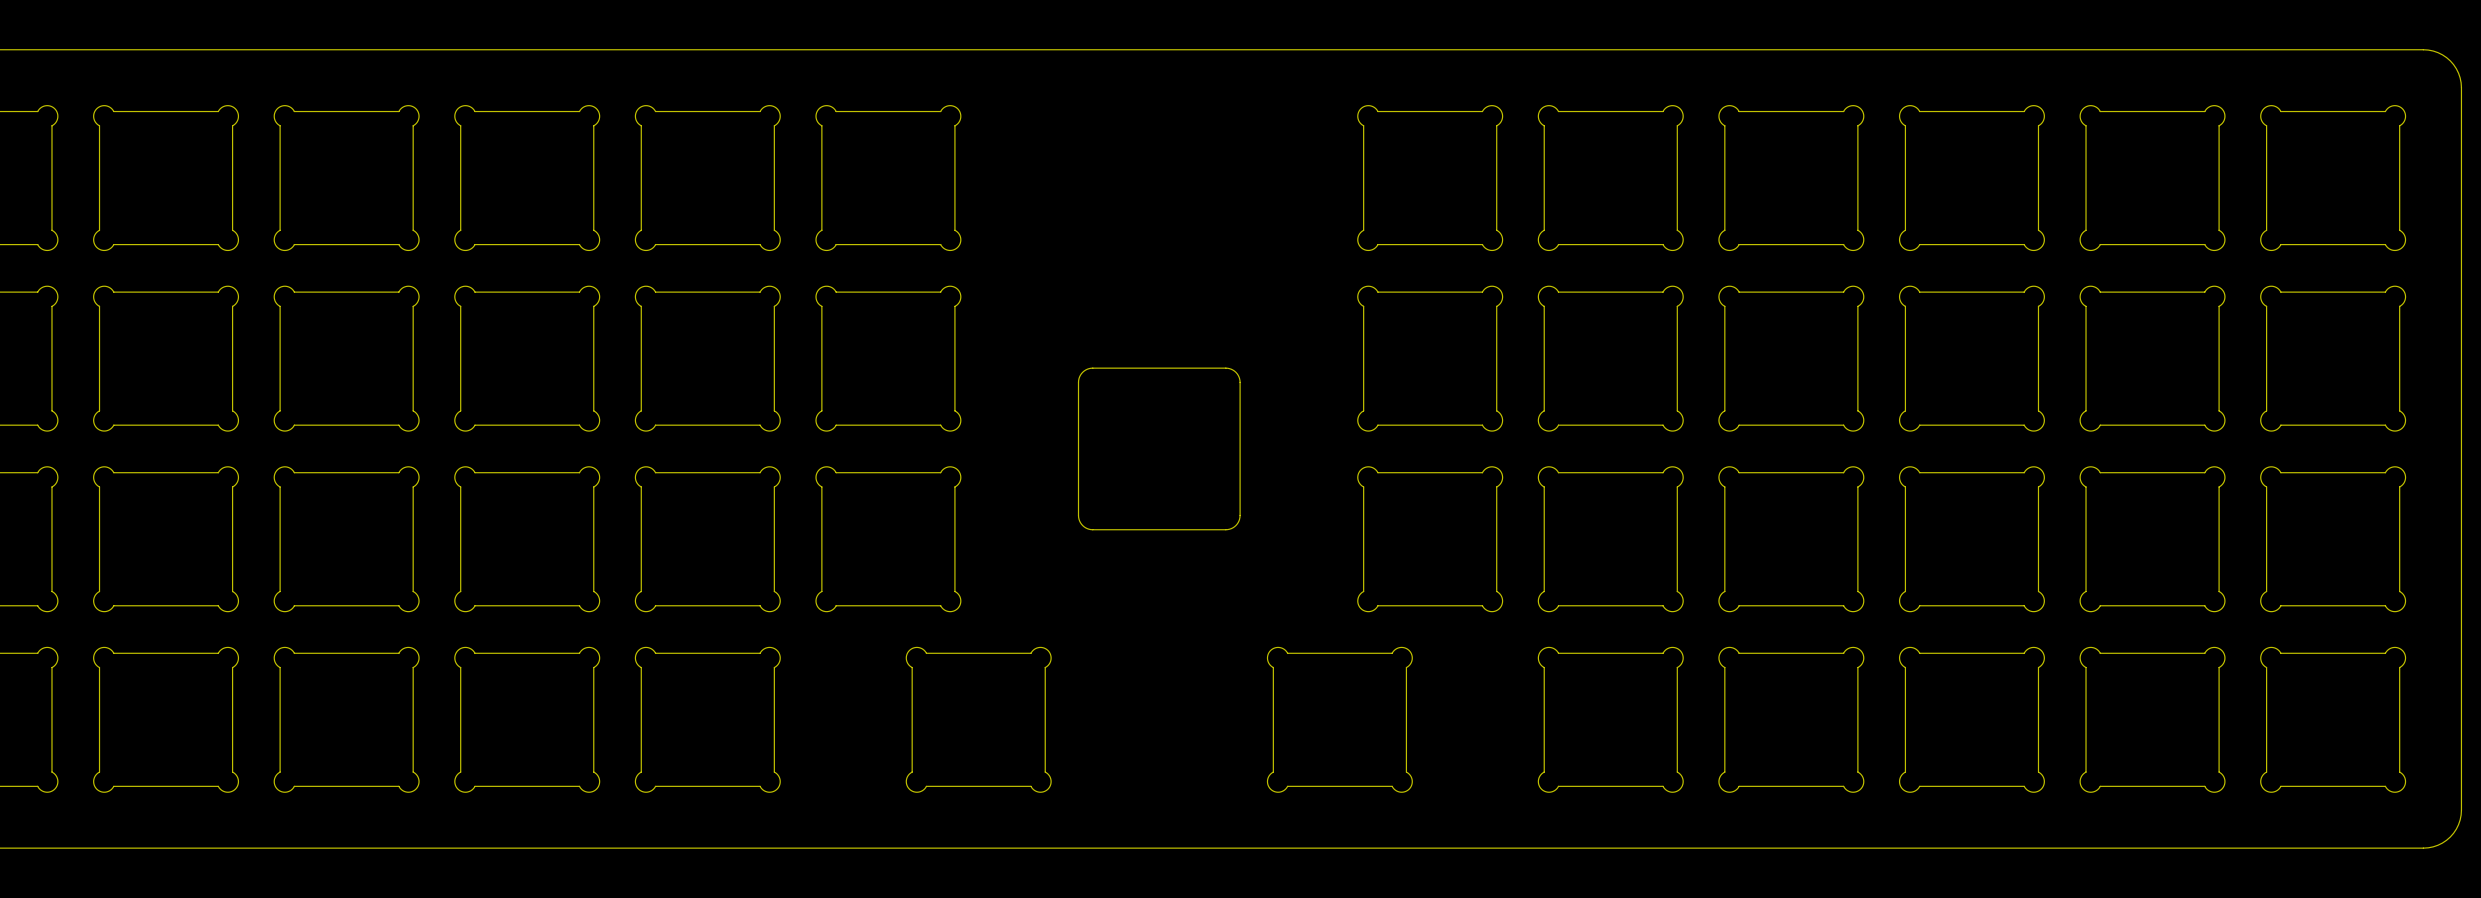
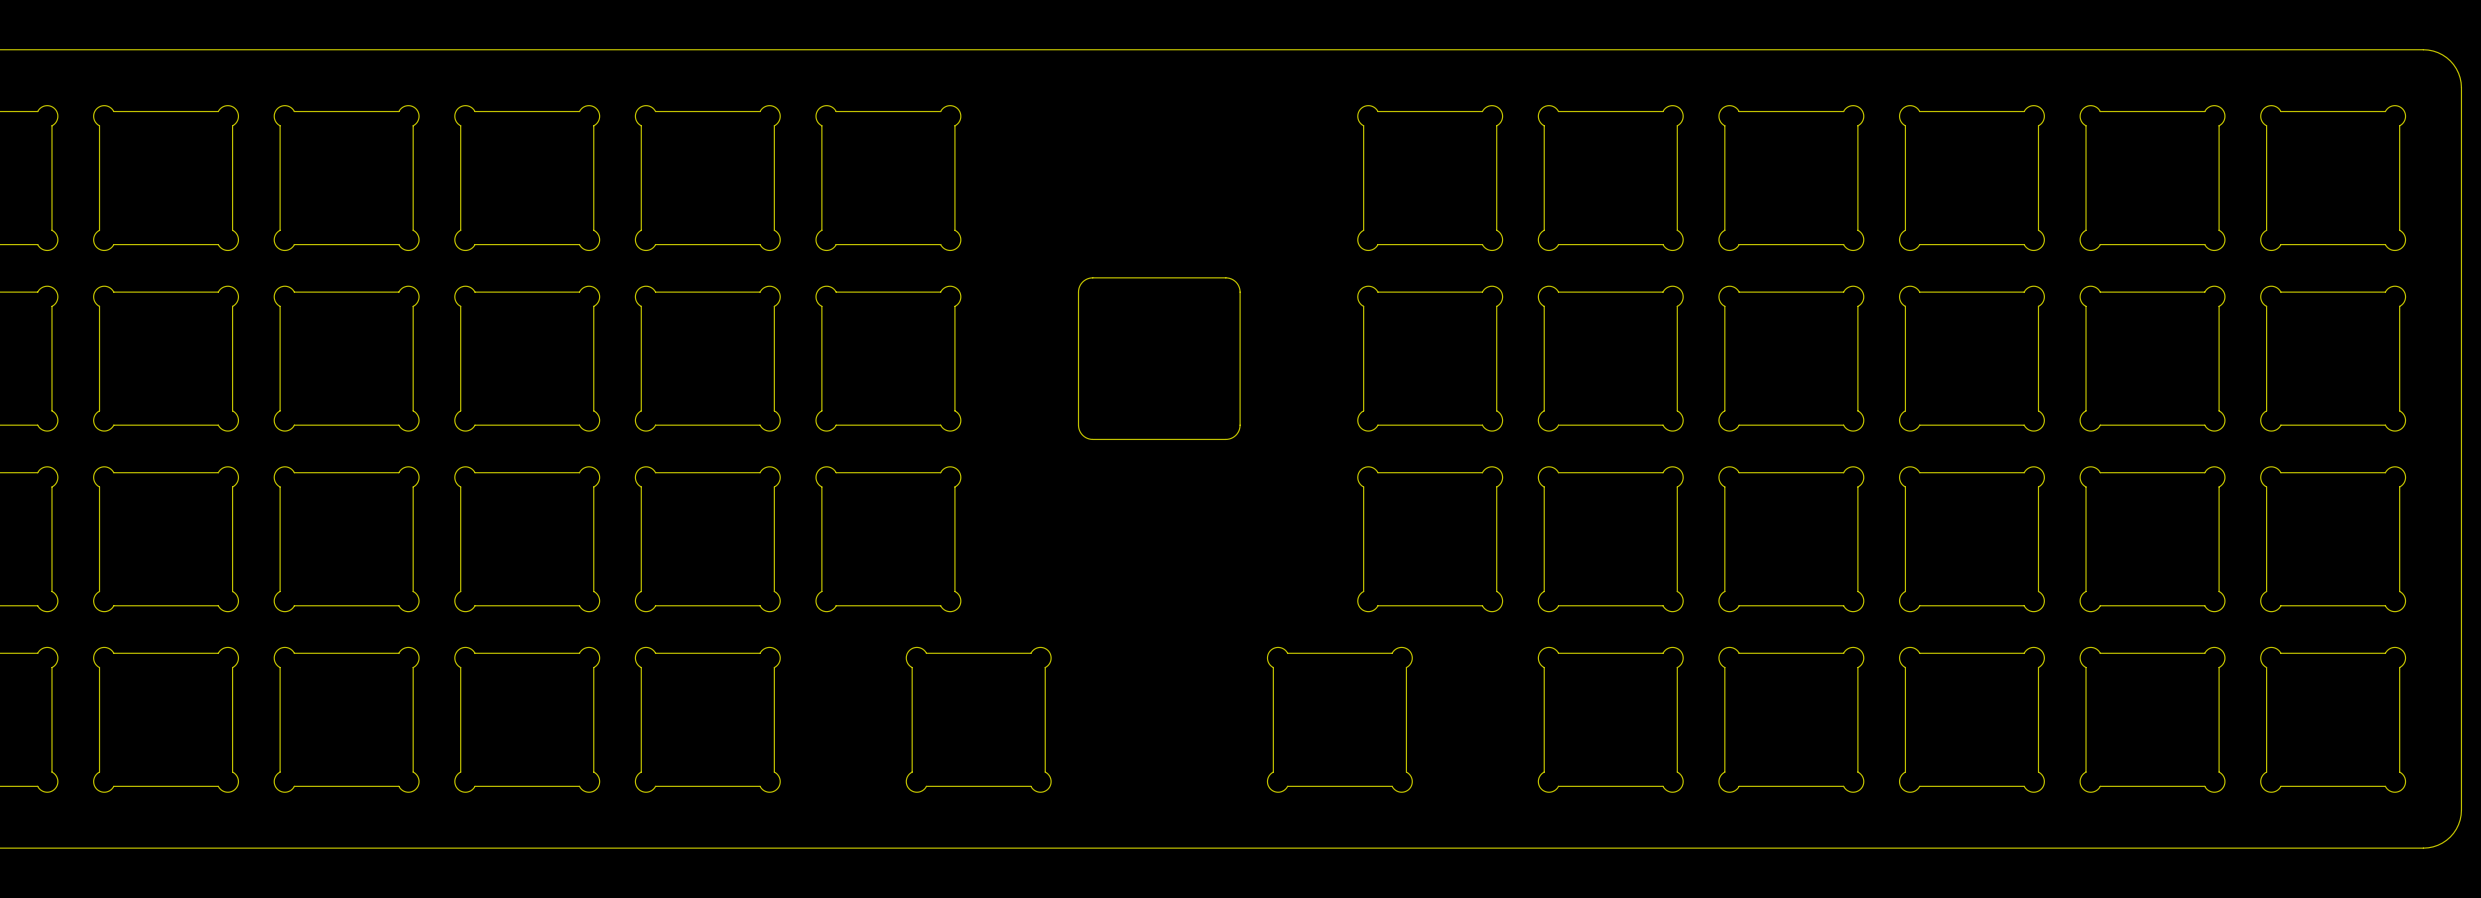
board edge: (1078, 382) (1082, 372) (1092, 368) (1227, 368) (1235, 372) (1240, 382) -> (1078, 382) (1078, 290) (1084, 280) (1092, 277) (1225, 277) (1234, 280) (1240, 292) (1240, 382)
board edge: (1078, 425) (1078, 517) (1082, 525) (1092, 529) (1225, 529) (1234, 526) (1240, 515) (1240, 425) -> (1078, 425) (1082, 435) (1092, 439) (1227, 439) (1235, 435) (1240, 425)

